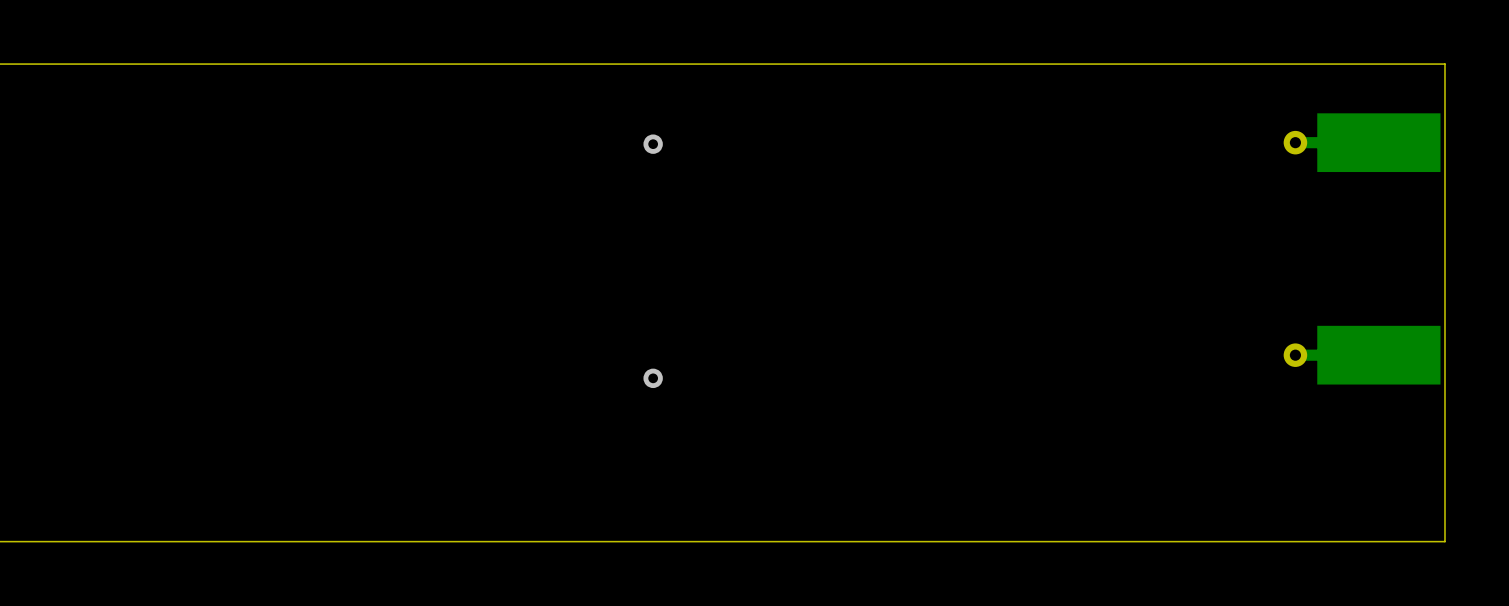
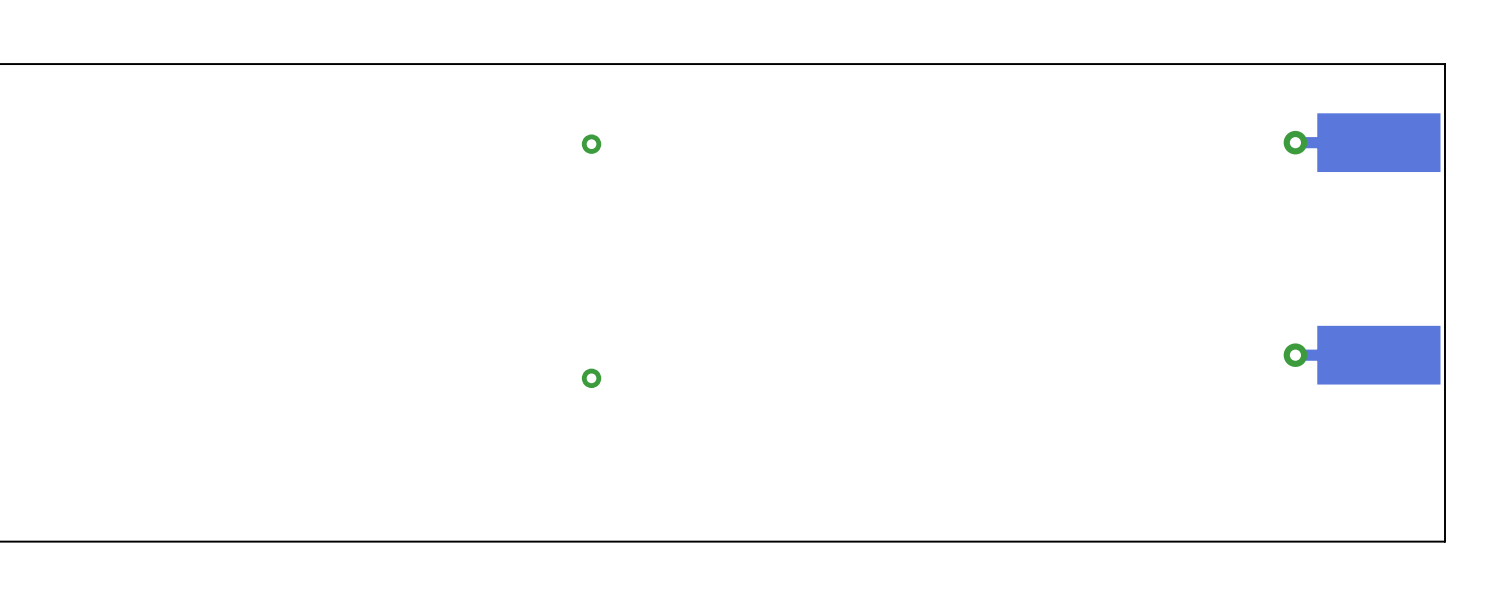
via position: (653, 144) -> (591, 144)
via position: (653, 378) -> (591, 378)

